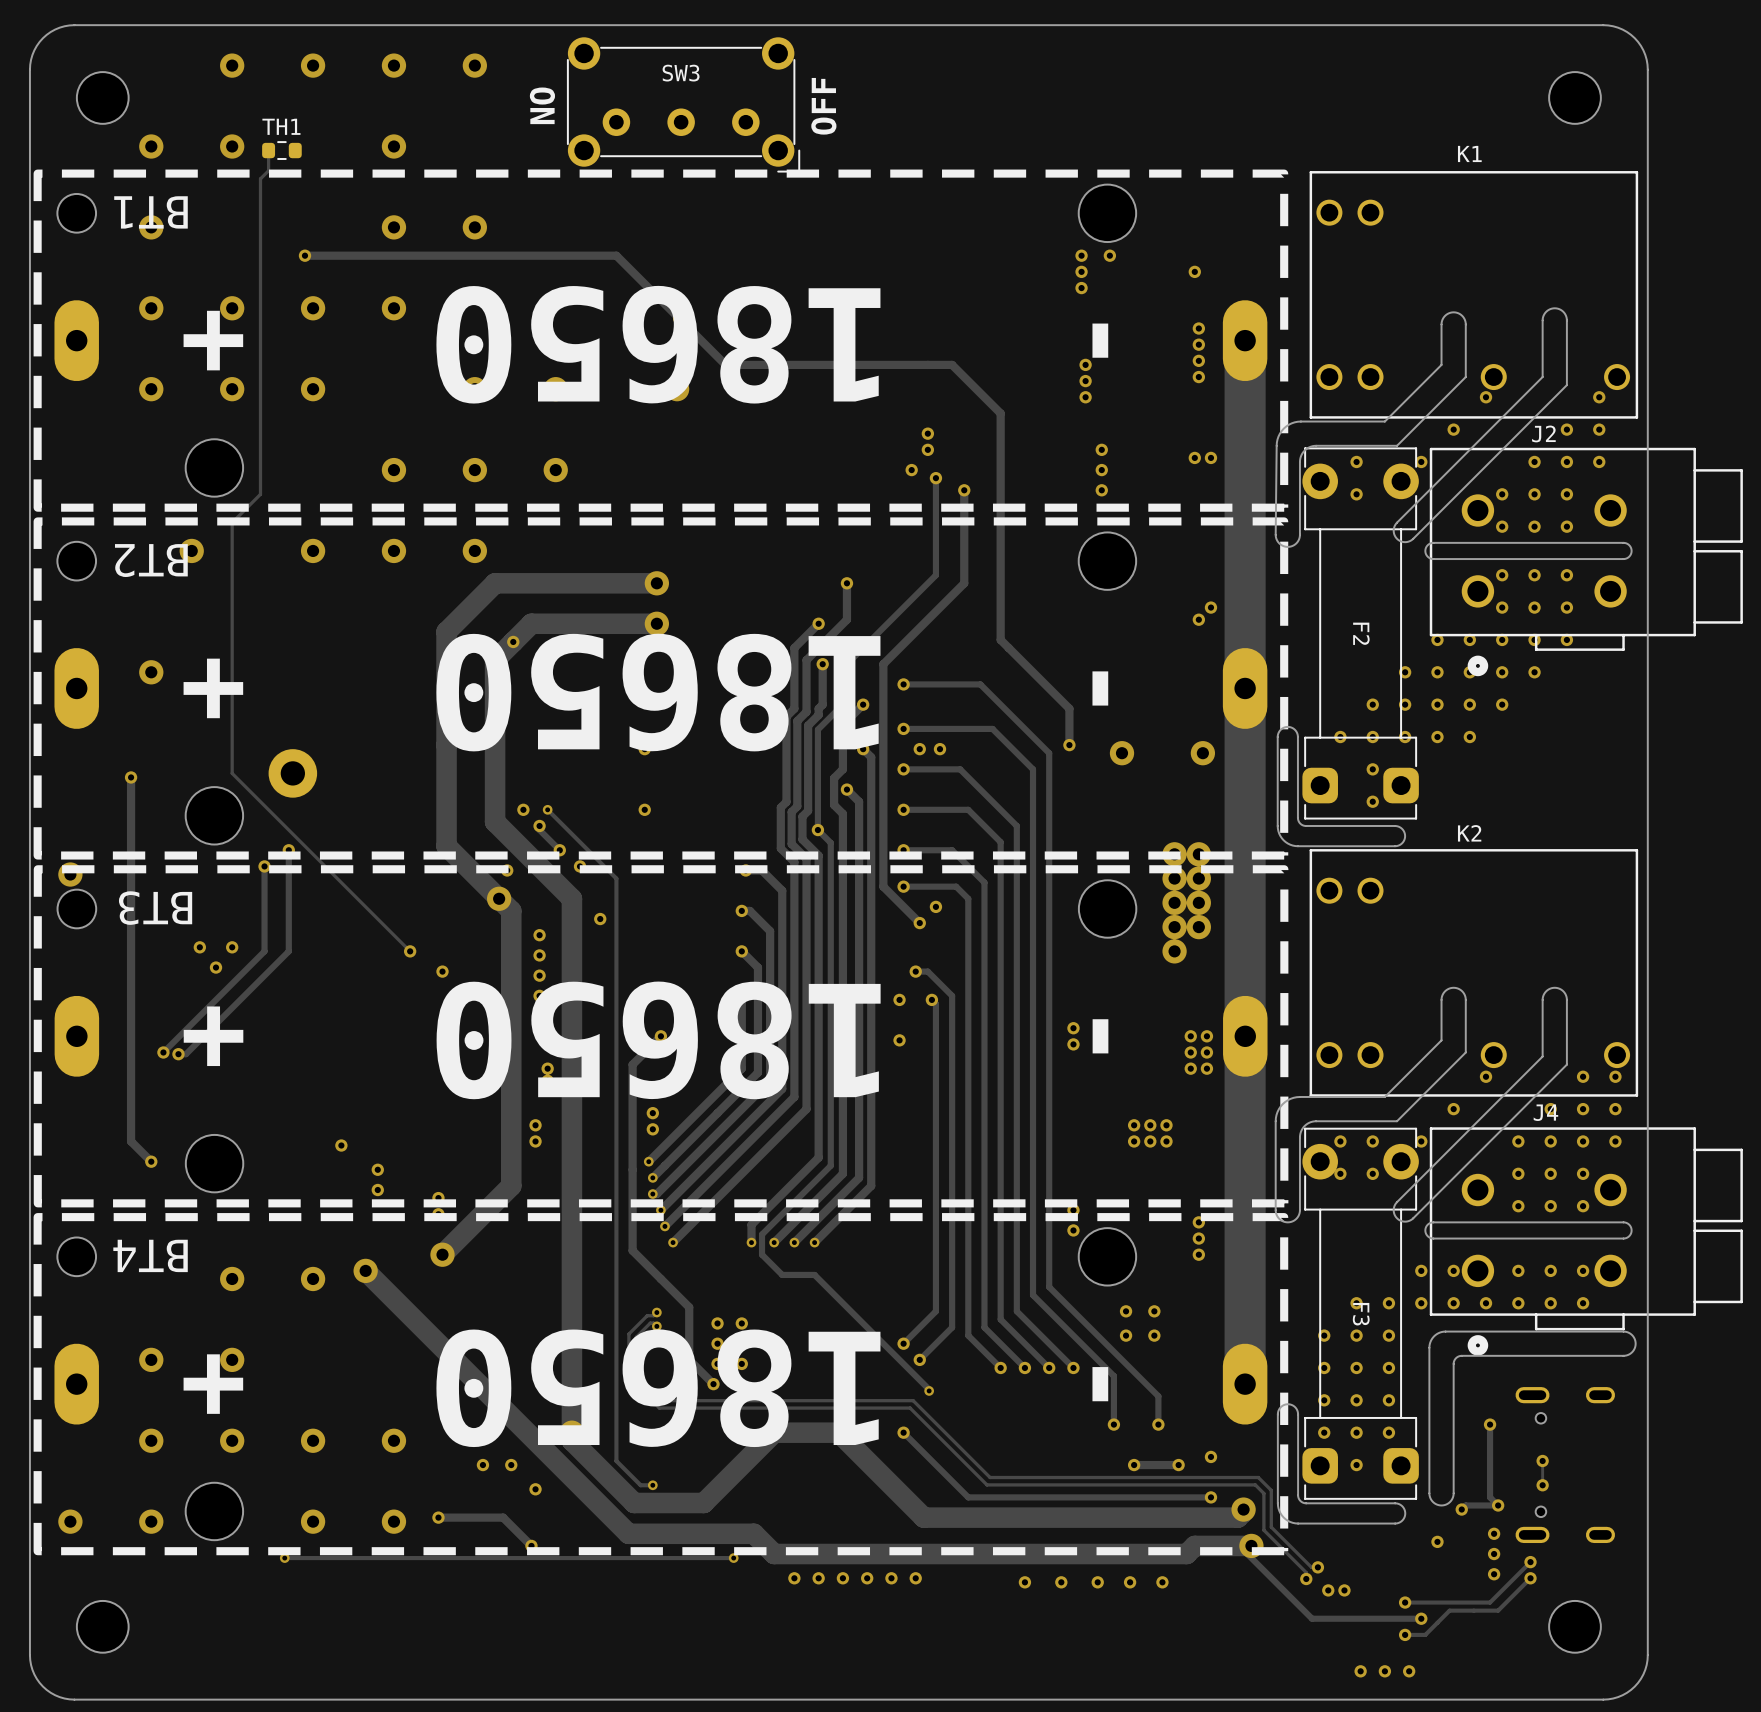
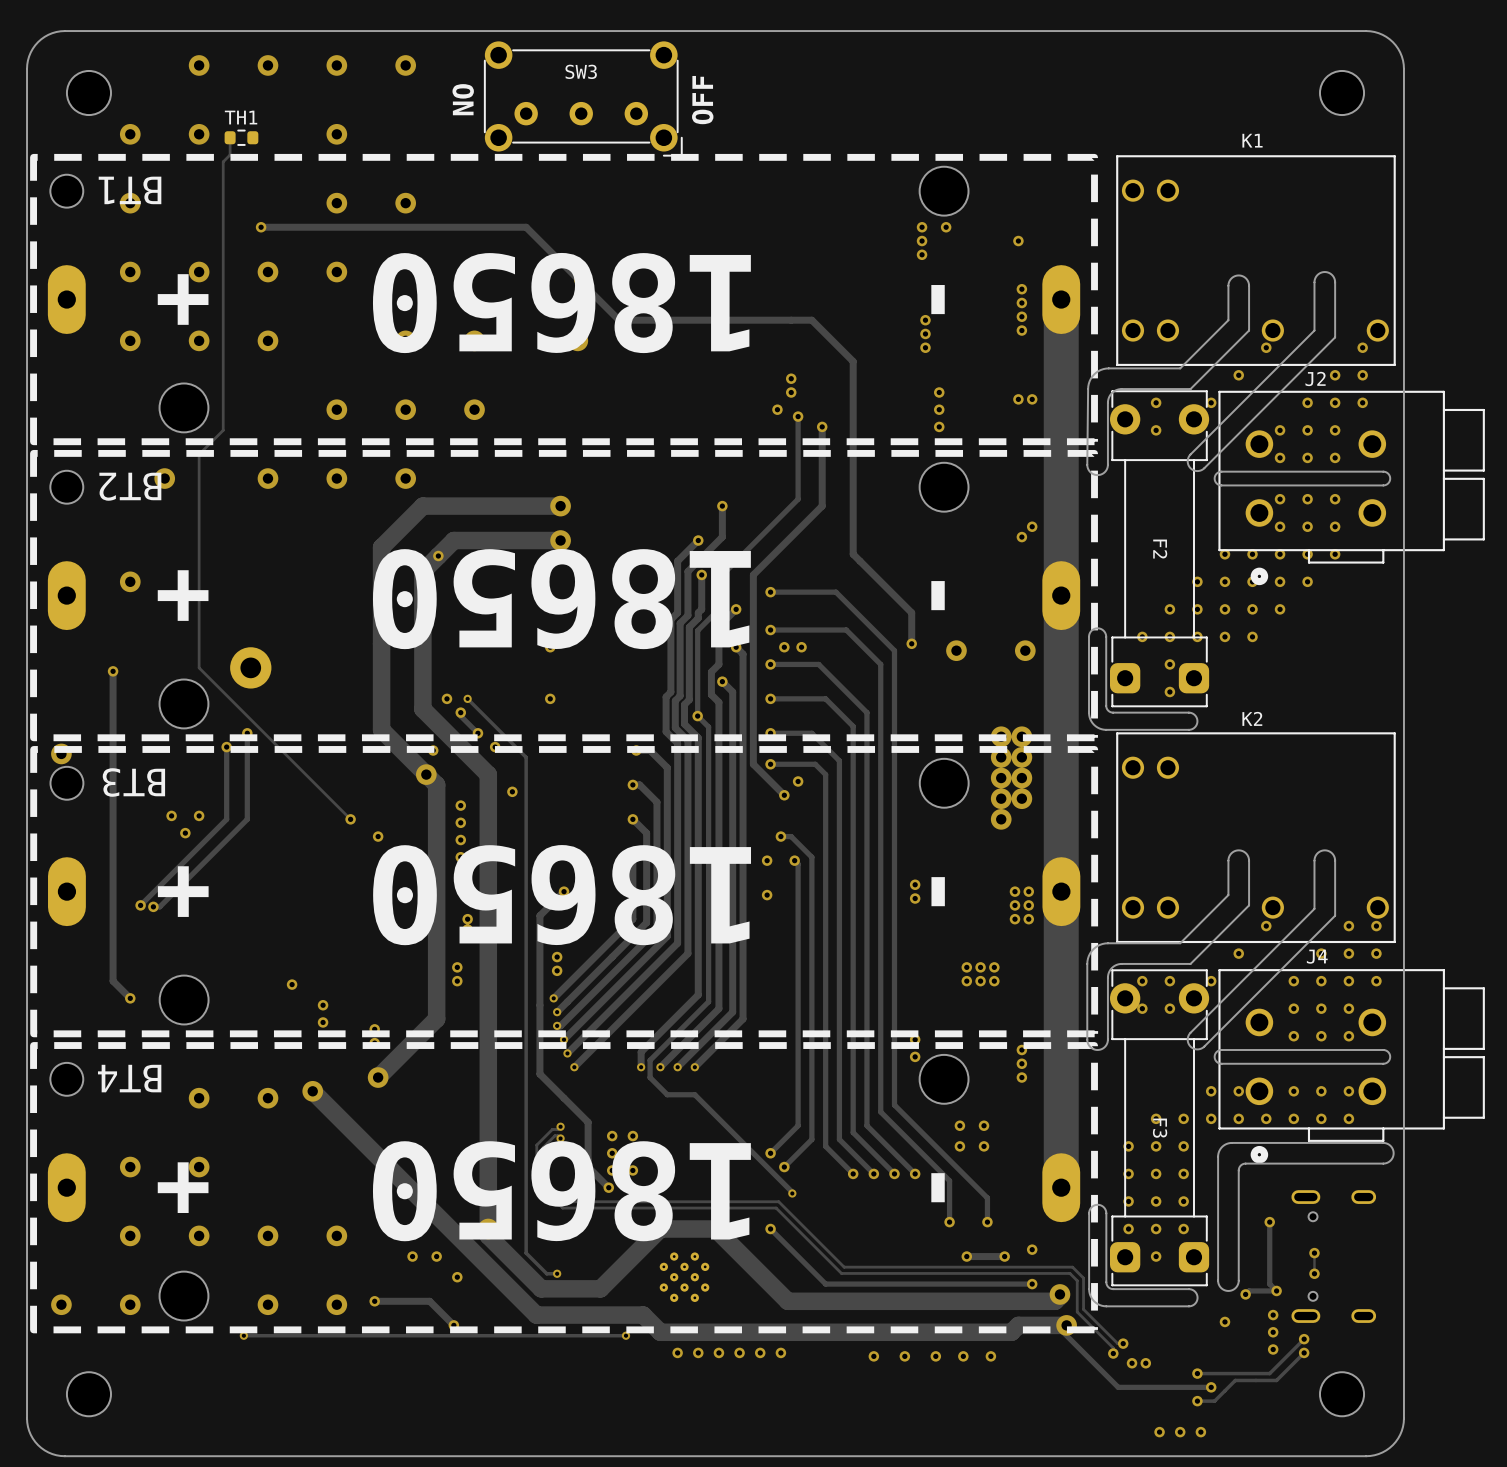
part: none -> (684, 1277)

